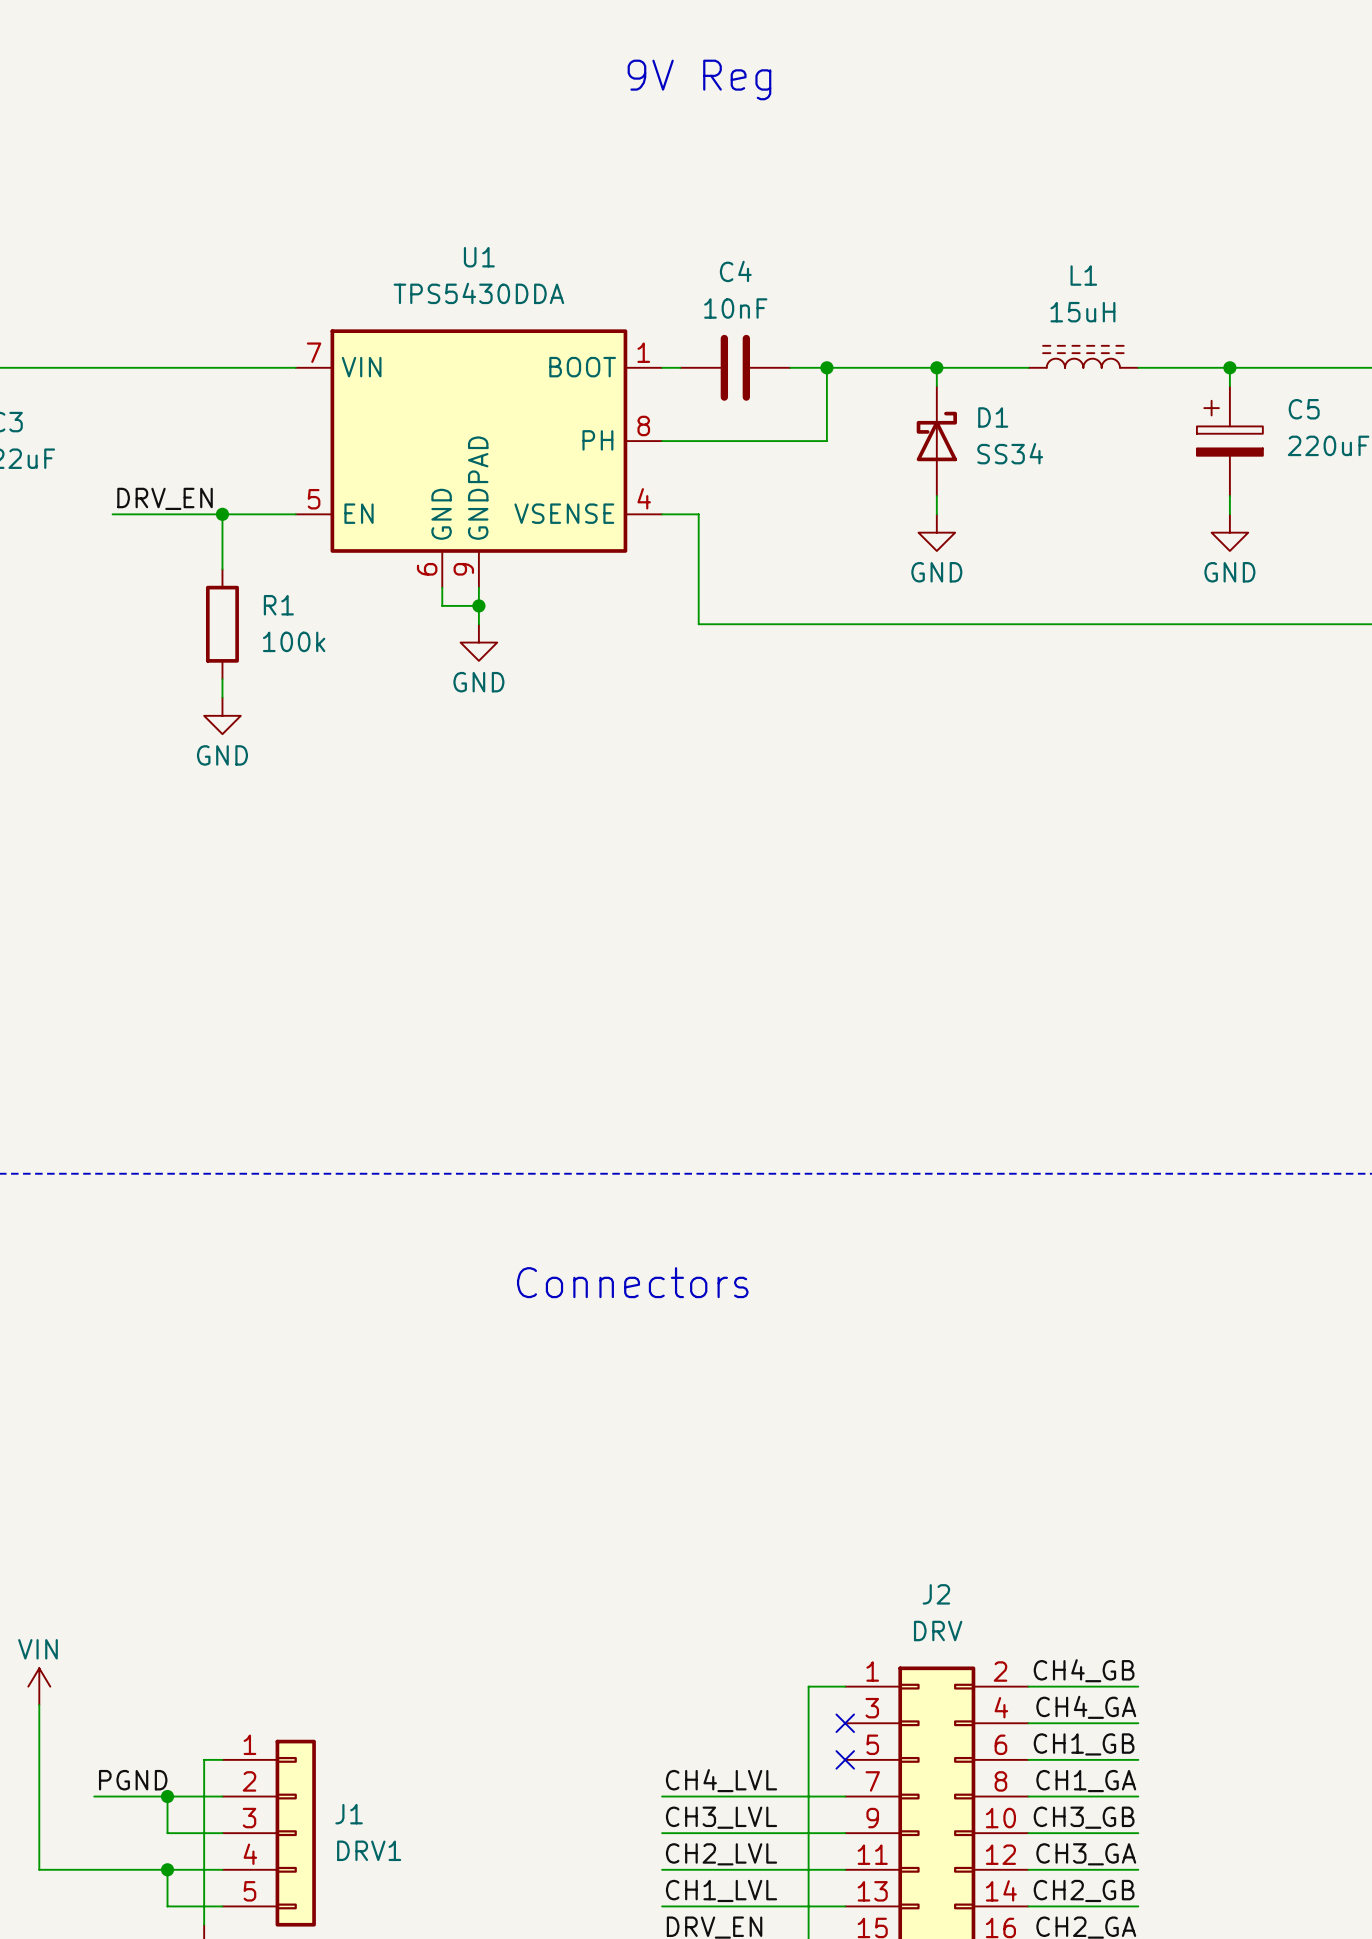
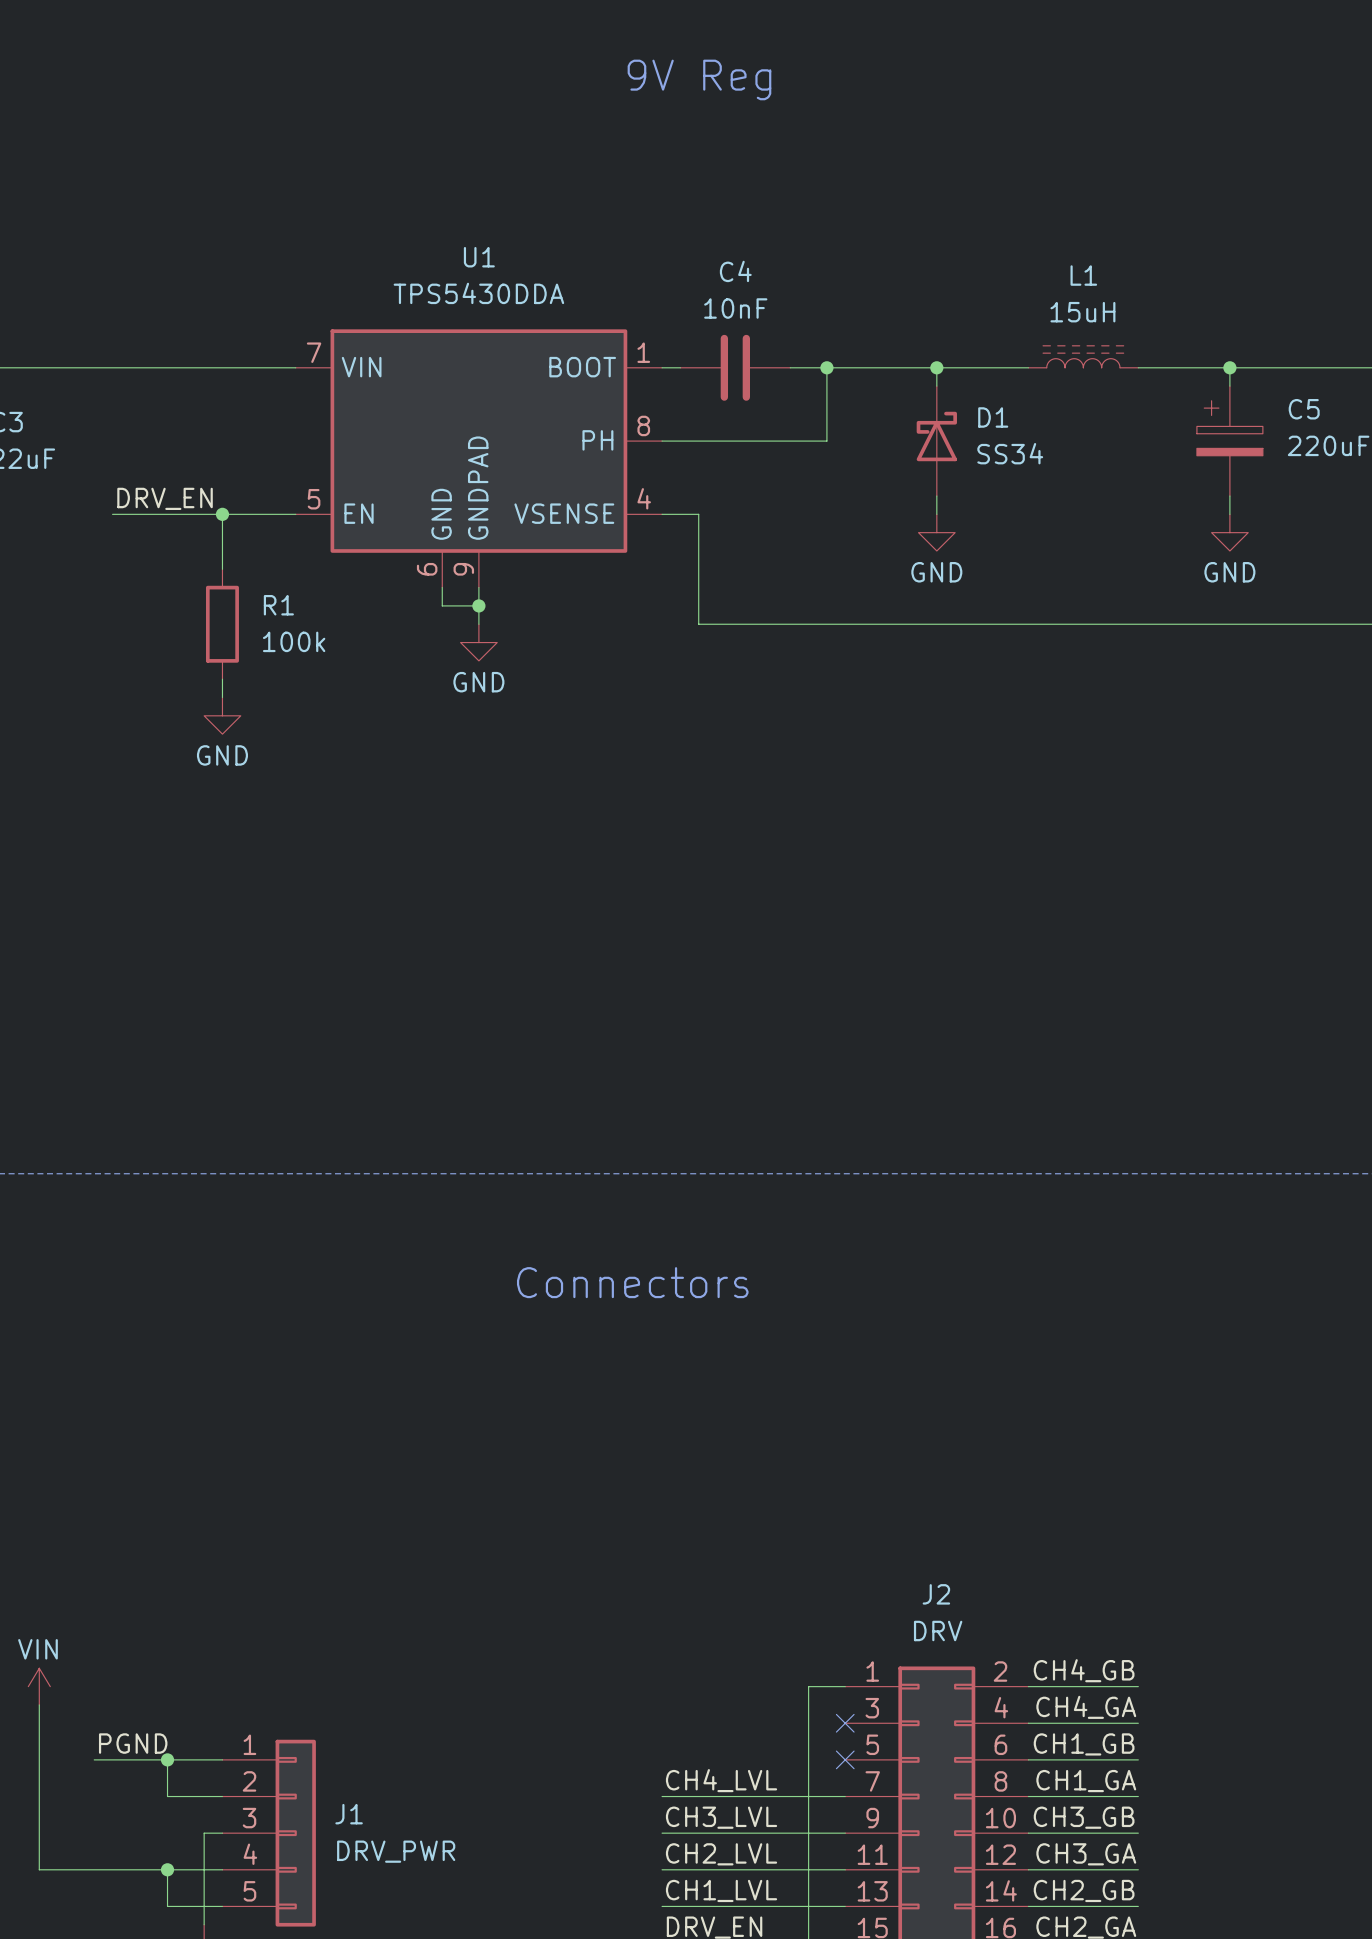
wire: none -> (167, 1759) (167, 1796)
wire: (204, 1759) (204, 1833) (167, 1833) (167, 1796) (94, 1796) -> (204, 1759) (94, 1759)
label position: PGND (133, 1780) -> PGND (133, 1743)
junction position: (167, 1796) -> (167, 1759)
J1 value: DRV1 (369, 1850) -> DRV_PWR (396, 1851)

